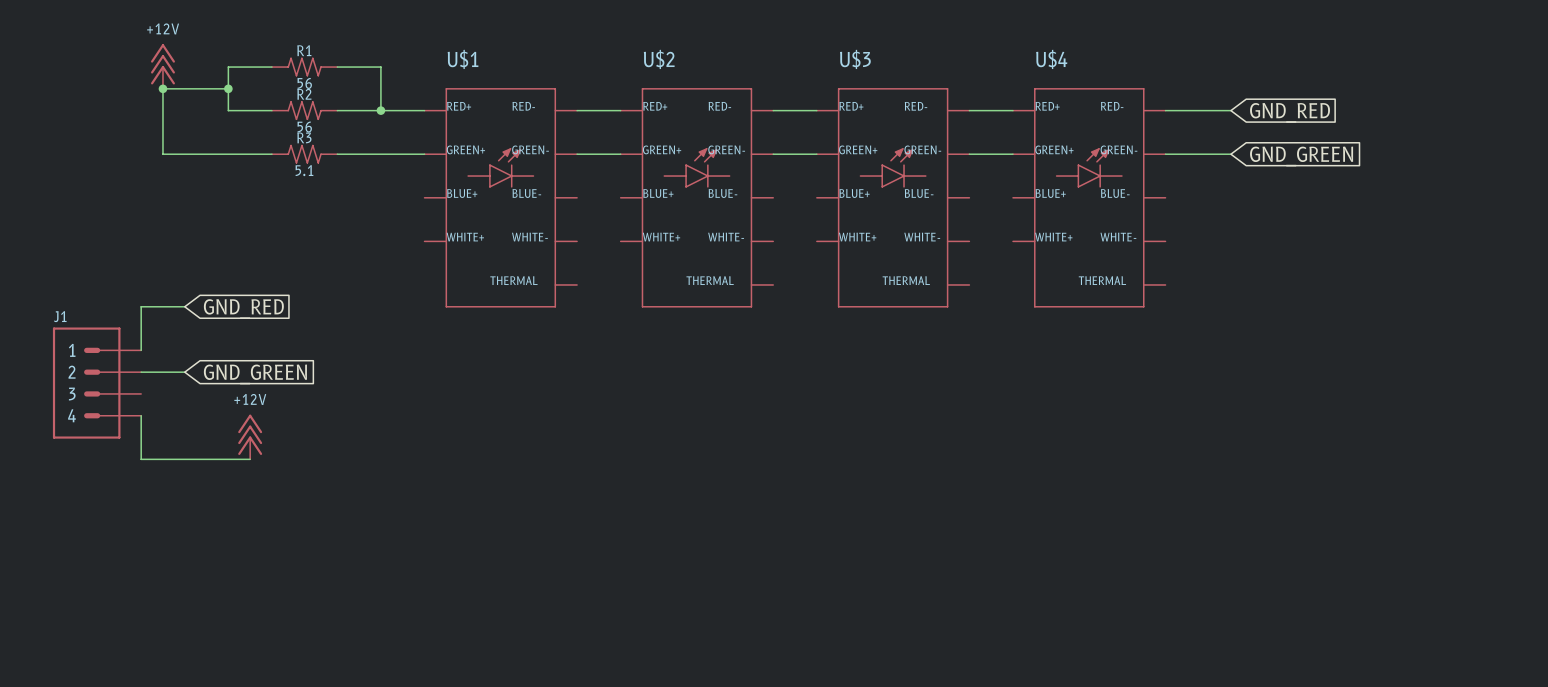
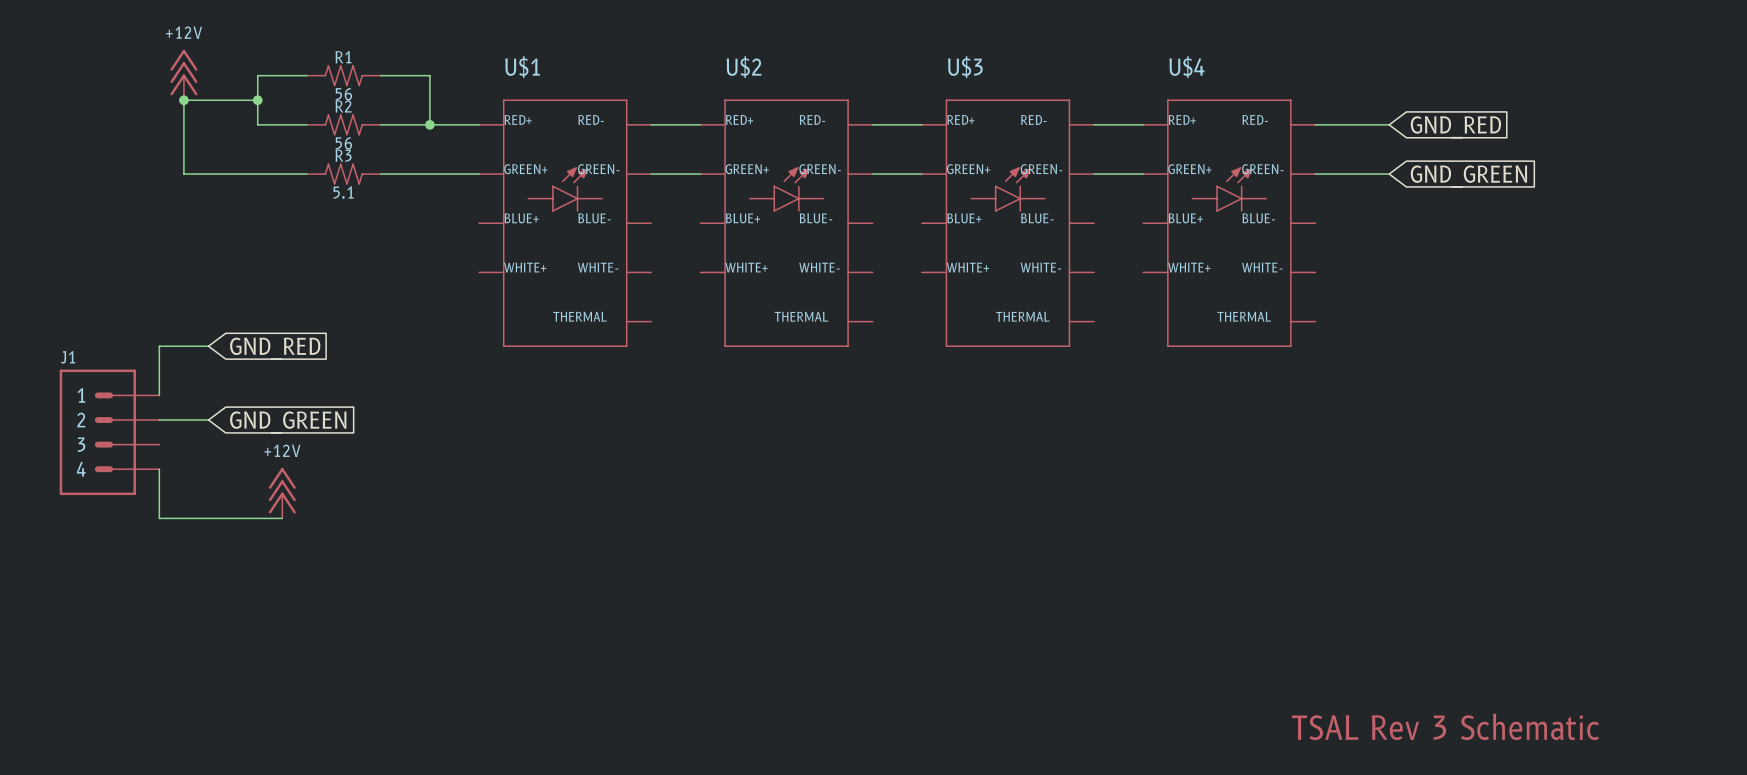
text: none -> TSAL Rev 3 Schematic (1445, 726)

